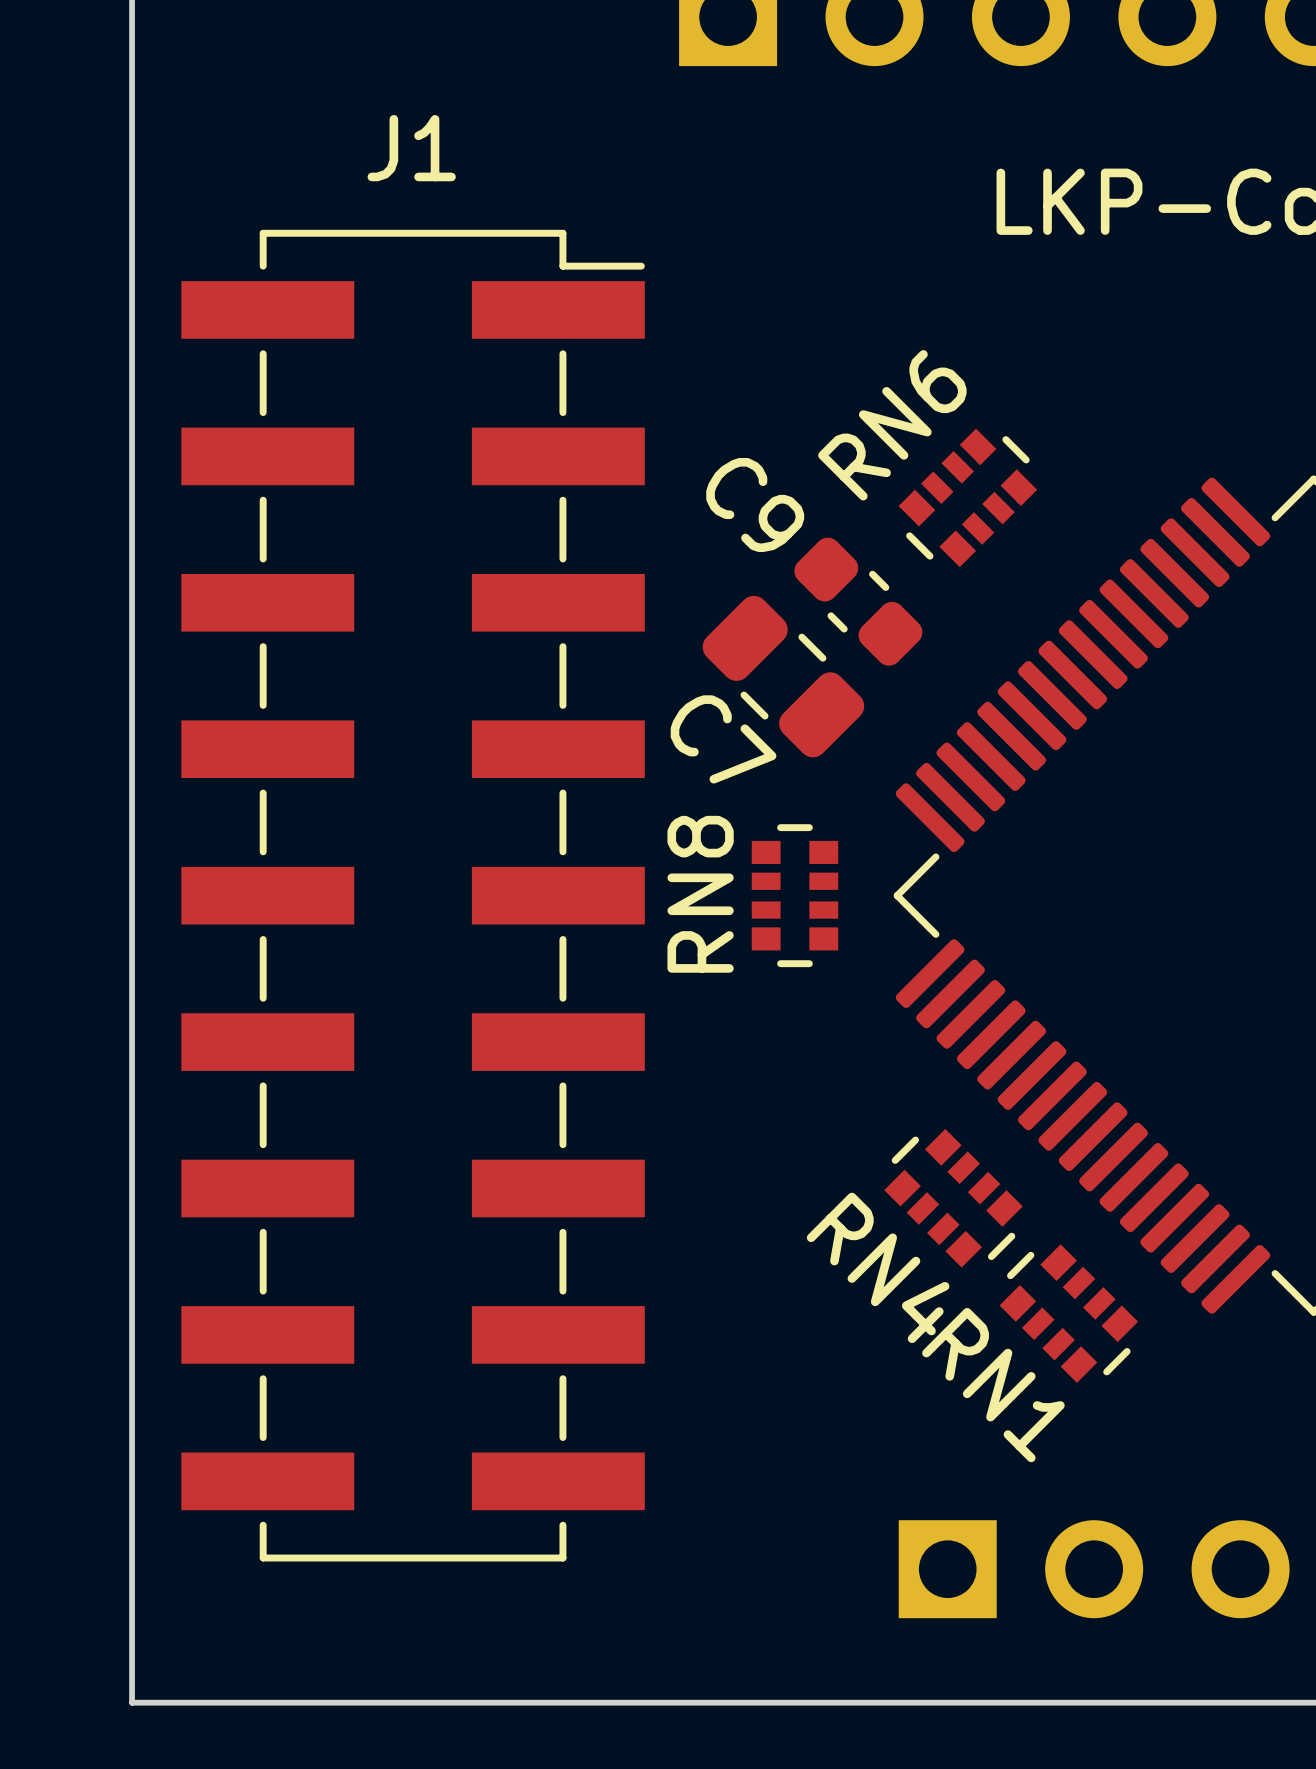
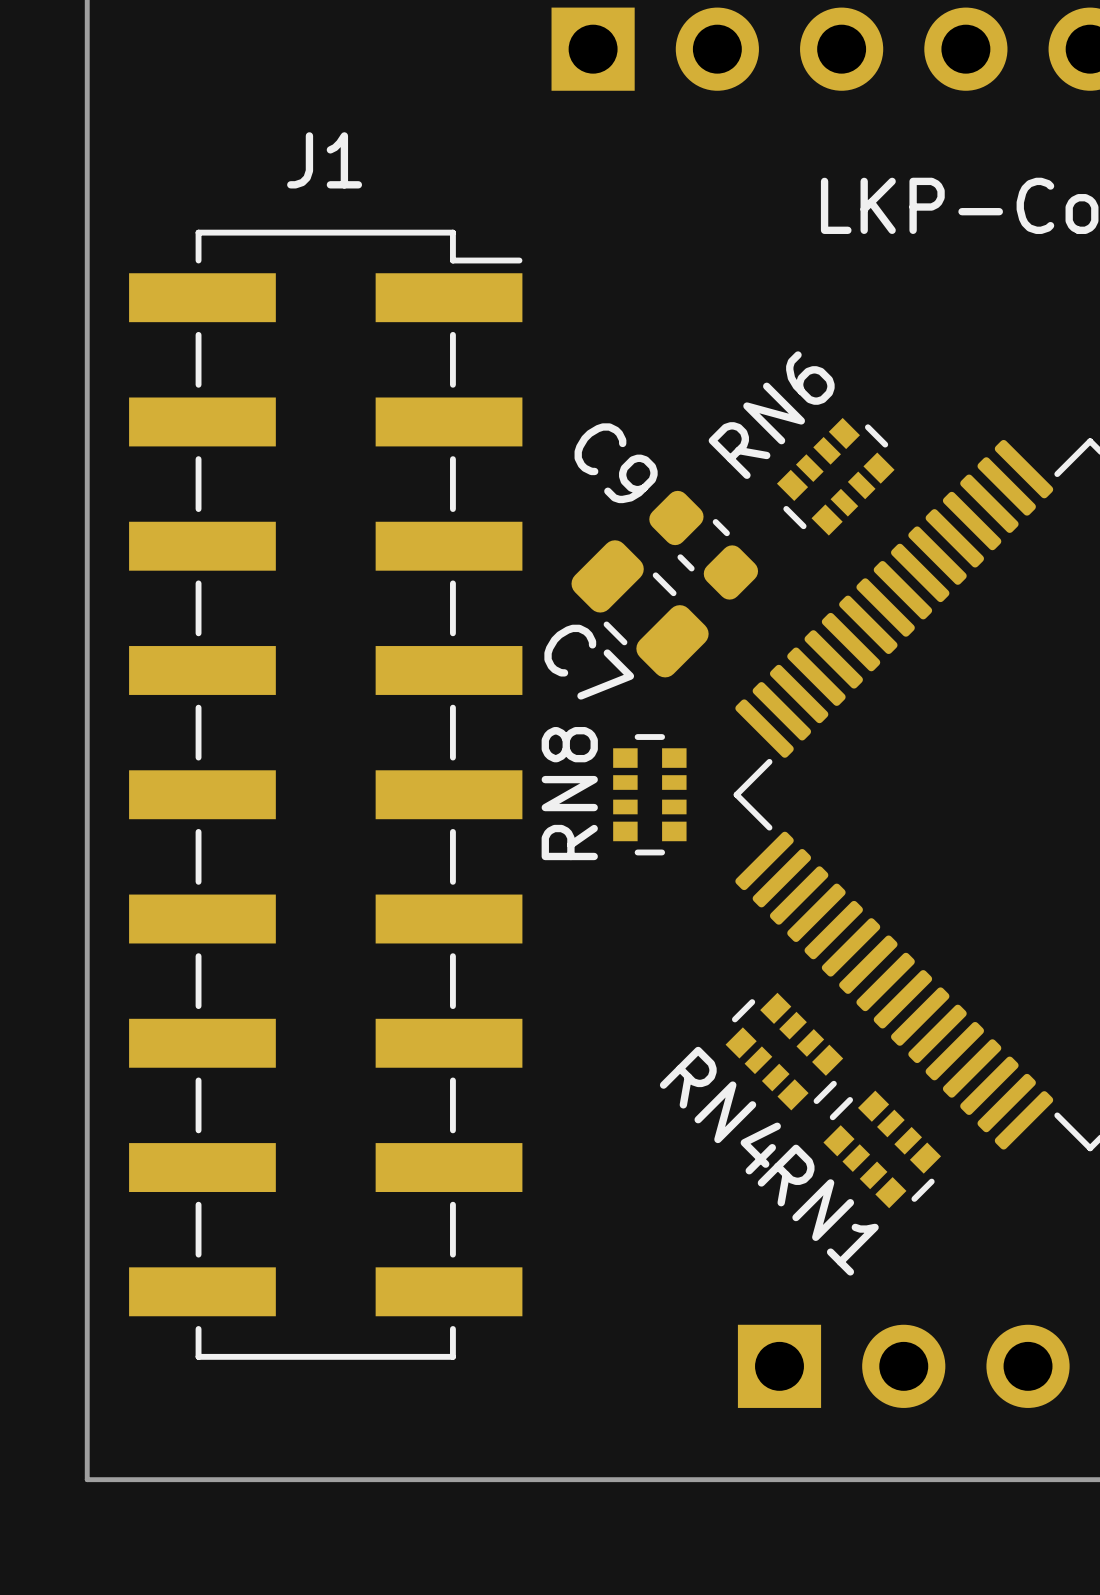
RN6 position: (967, 497) -> (835, 476)

